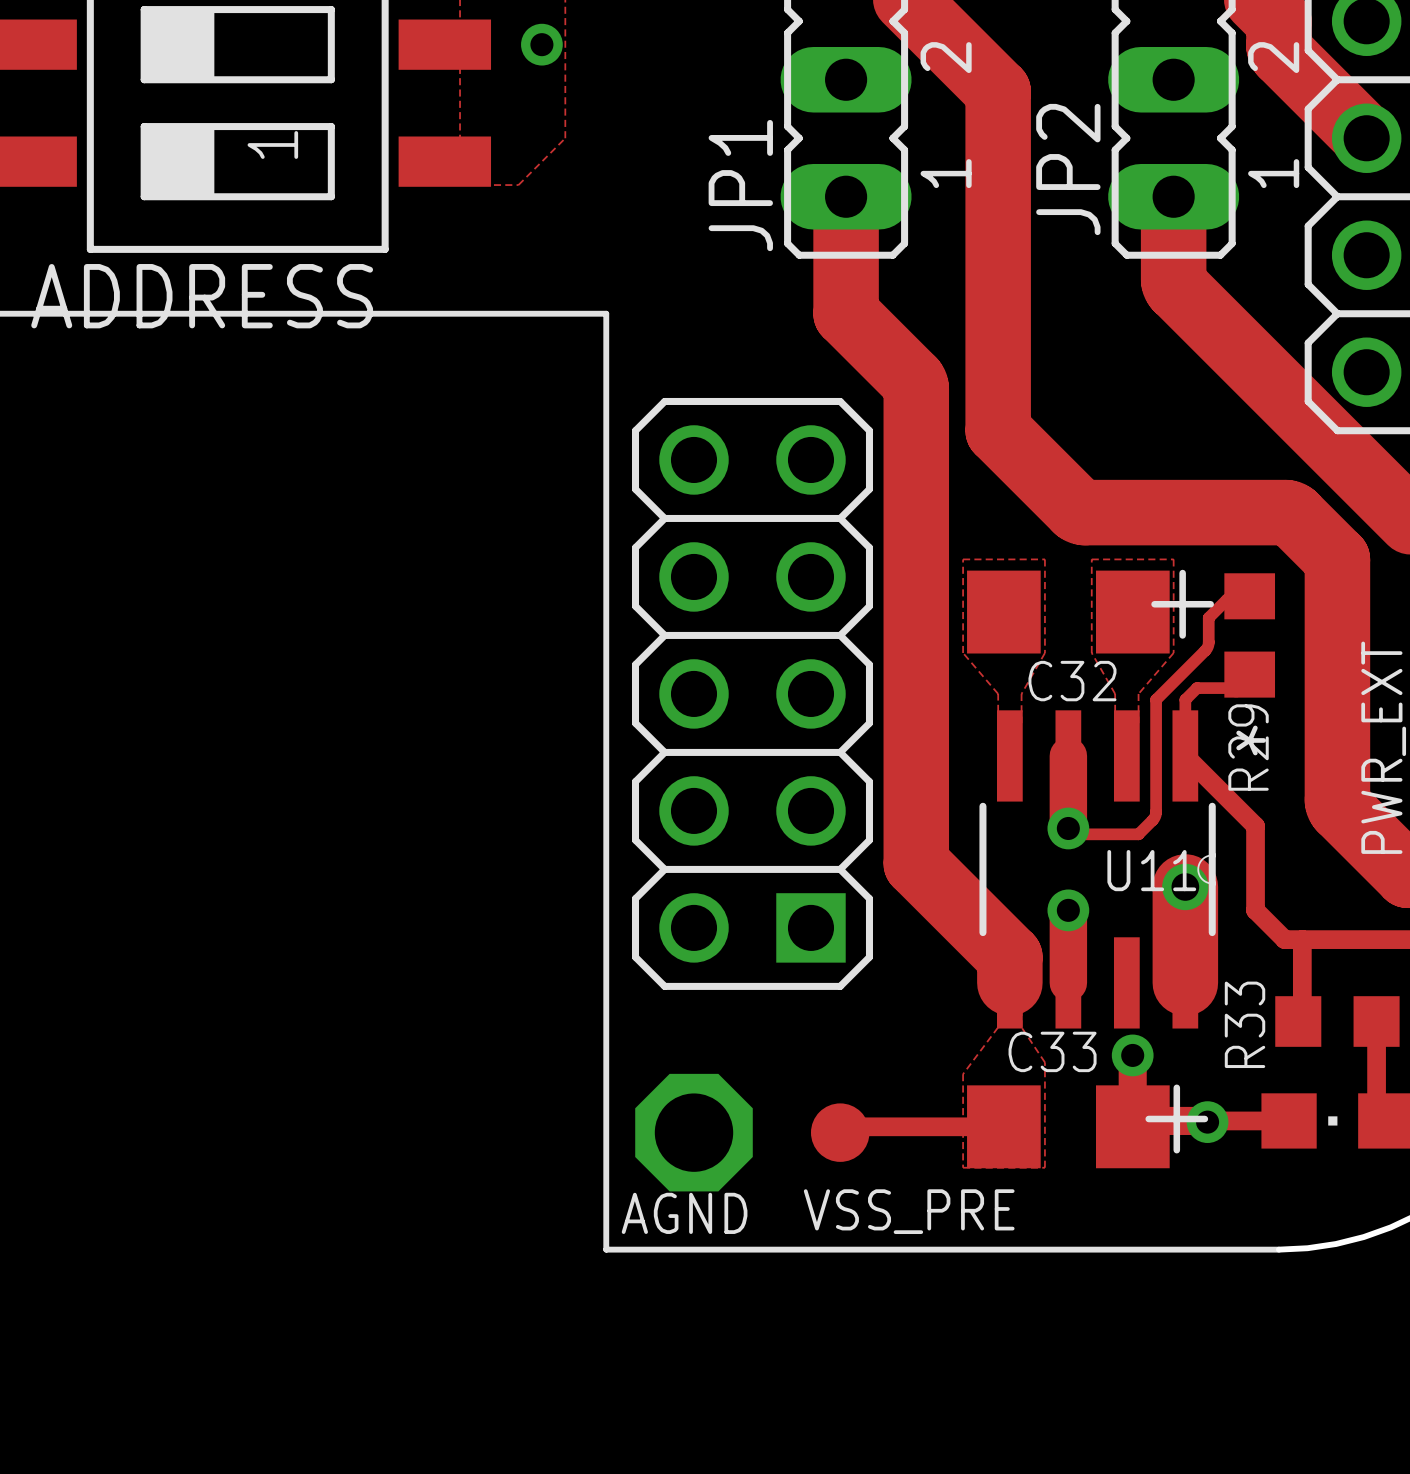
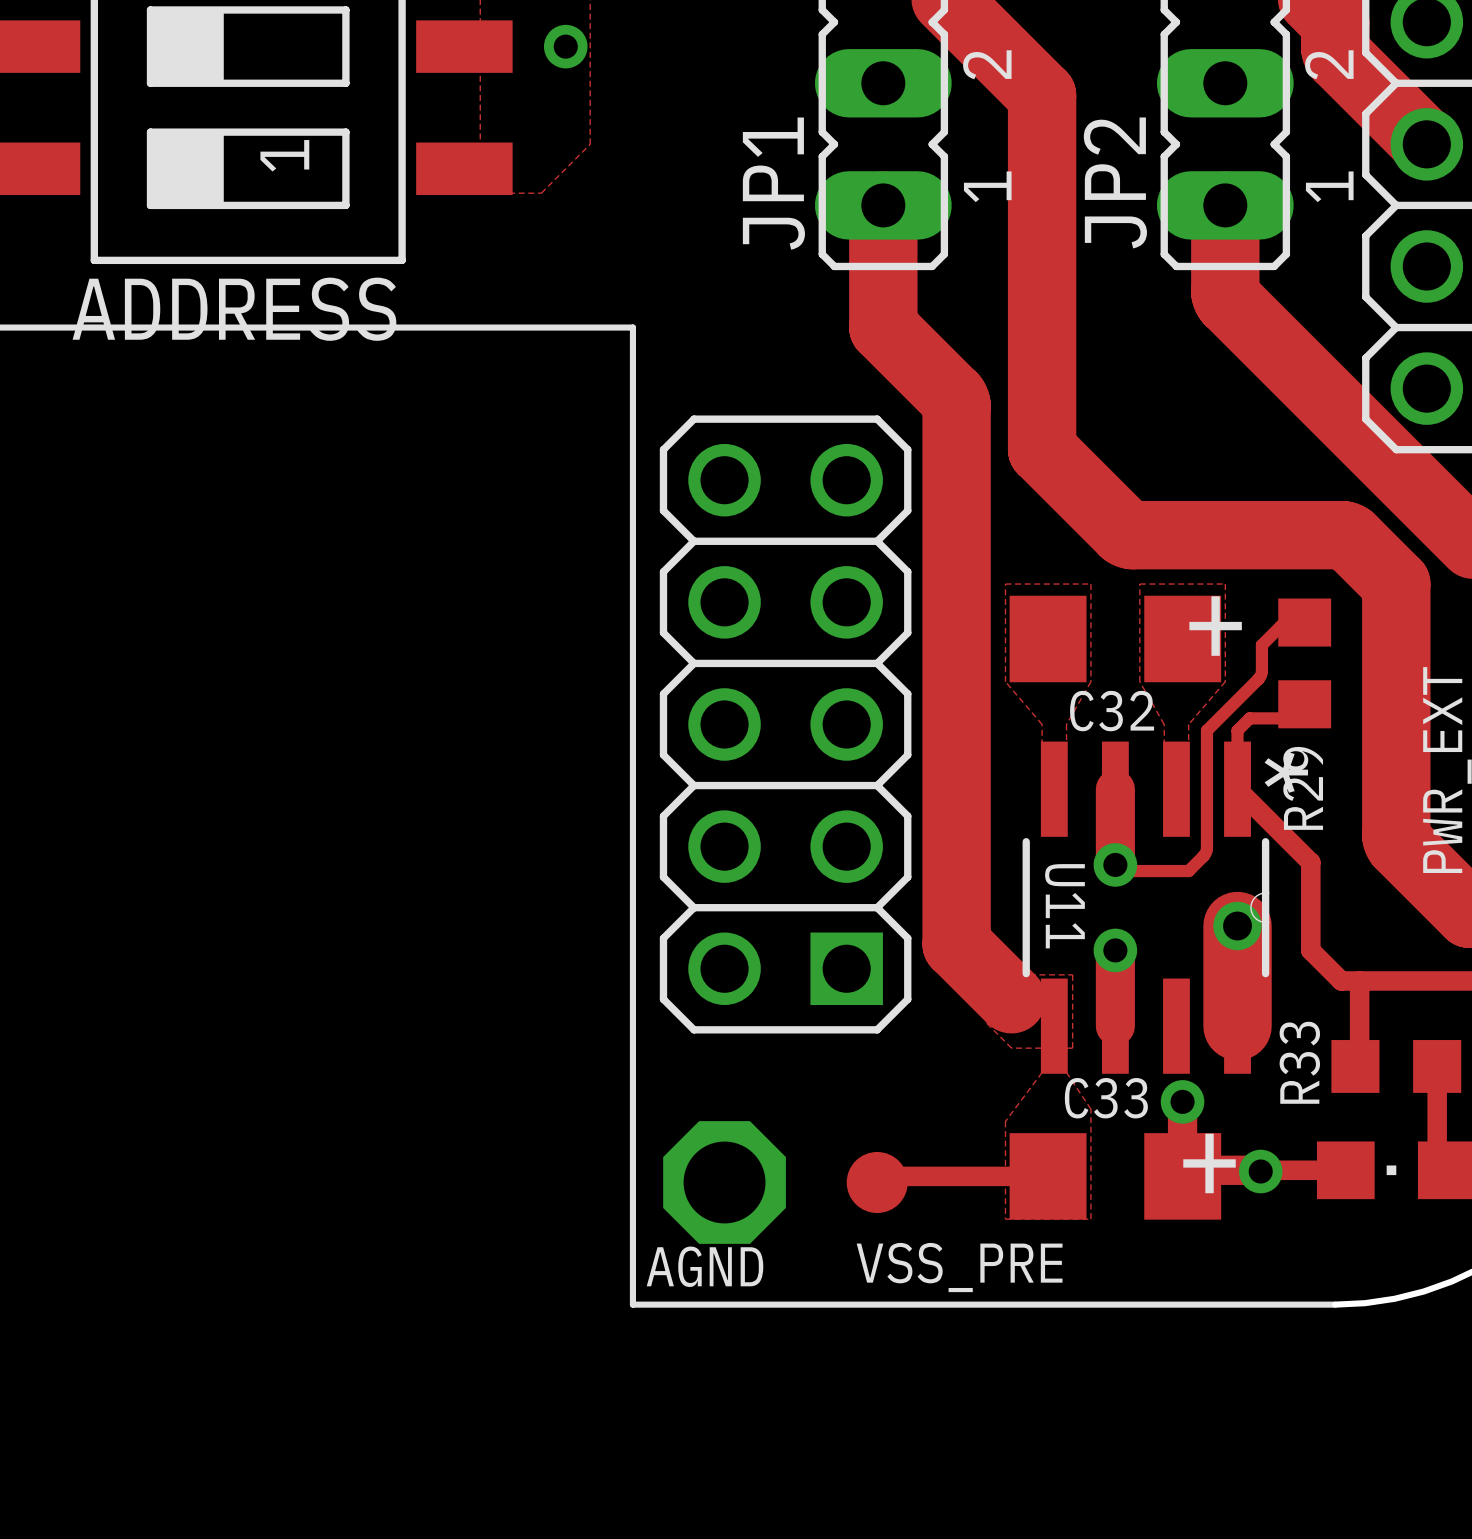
track: (916, 863) (1009, 957) (1009, 982) -> (956, 901) (956, 944) (1011, 999)
U11 name rotation: 0° (1151, 870) -> 90° clockwise (1064, 906)
U11 name position: U11 (1151, 870) -> U11 (1064, 906)
zone outline: none -> (1042, 1048) (1011, 1048) (987, 1023) (987, 1017) (1029, 974) (1072, 974) (1072, 1048) (1066, 1048)

